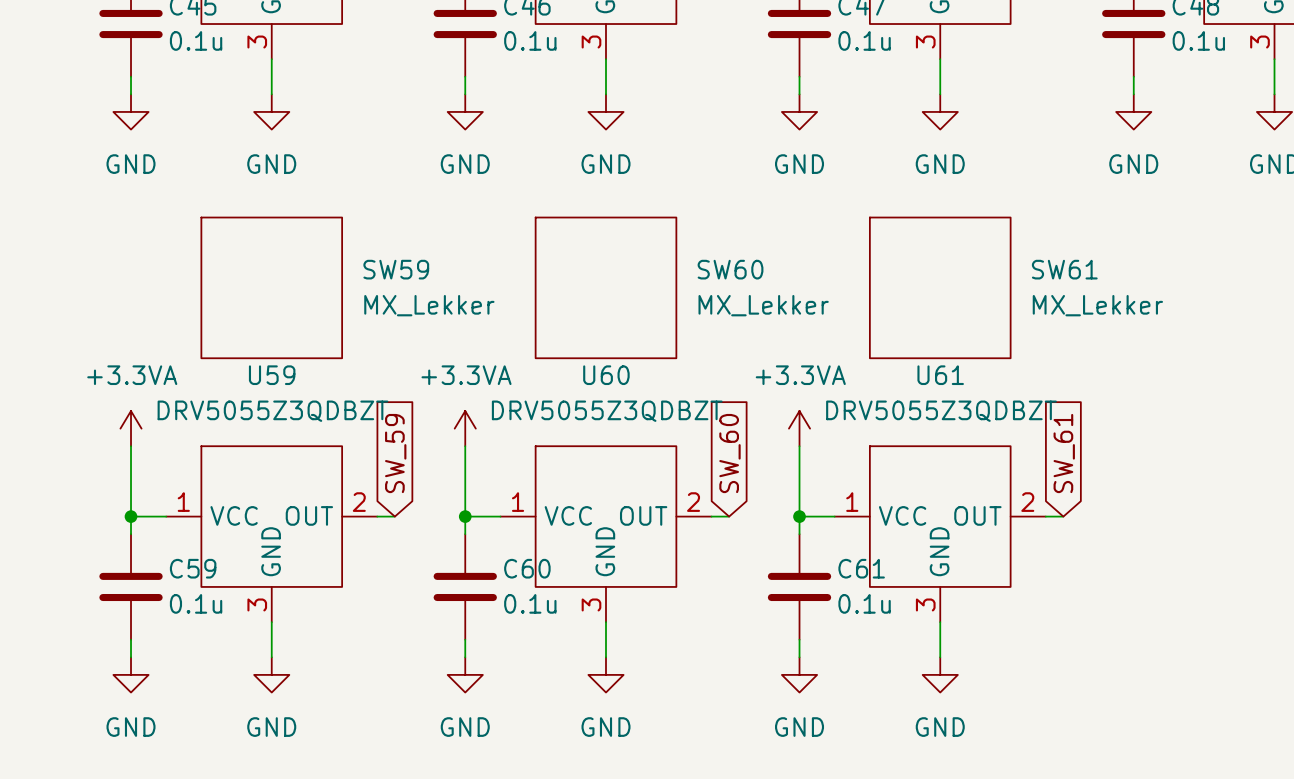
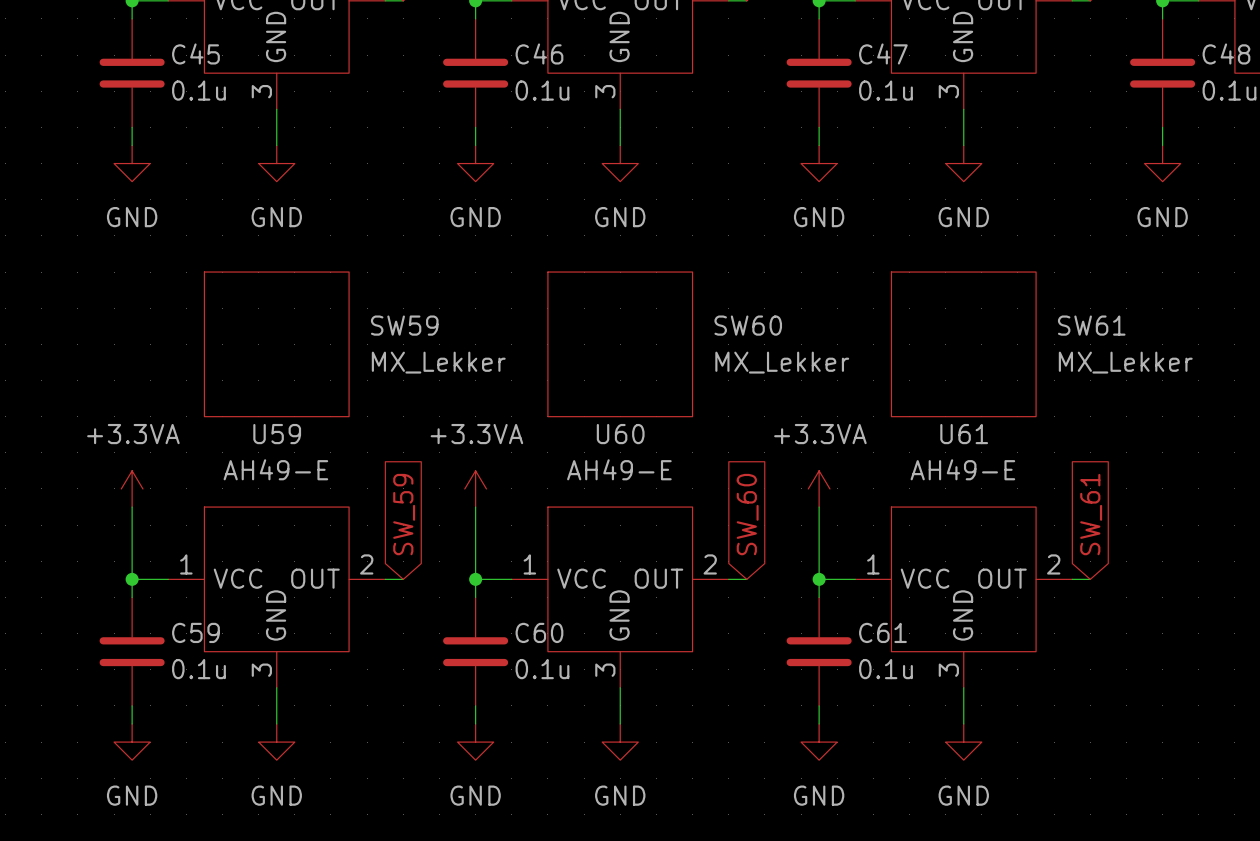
U59 value: DRV5055Z3QDBZT (273, 411) -> AH49-E (275, 469)
U60 value: DRV5055Z3QDBZT (607, 411) -> AH49-E (619, 469)
U61 value: DRV5055Z3QDBZT (941, 411) -> AH49-E (962, 469)

